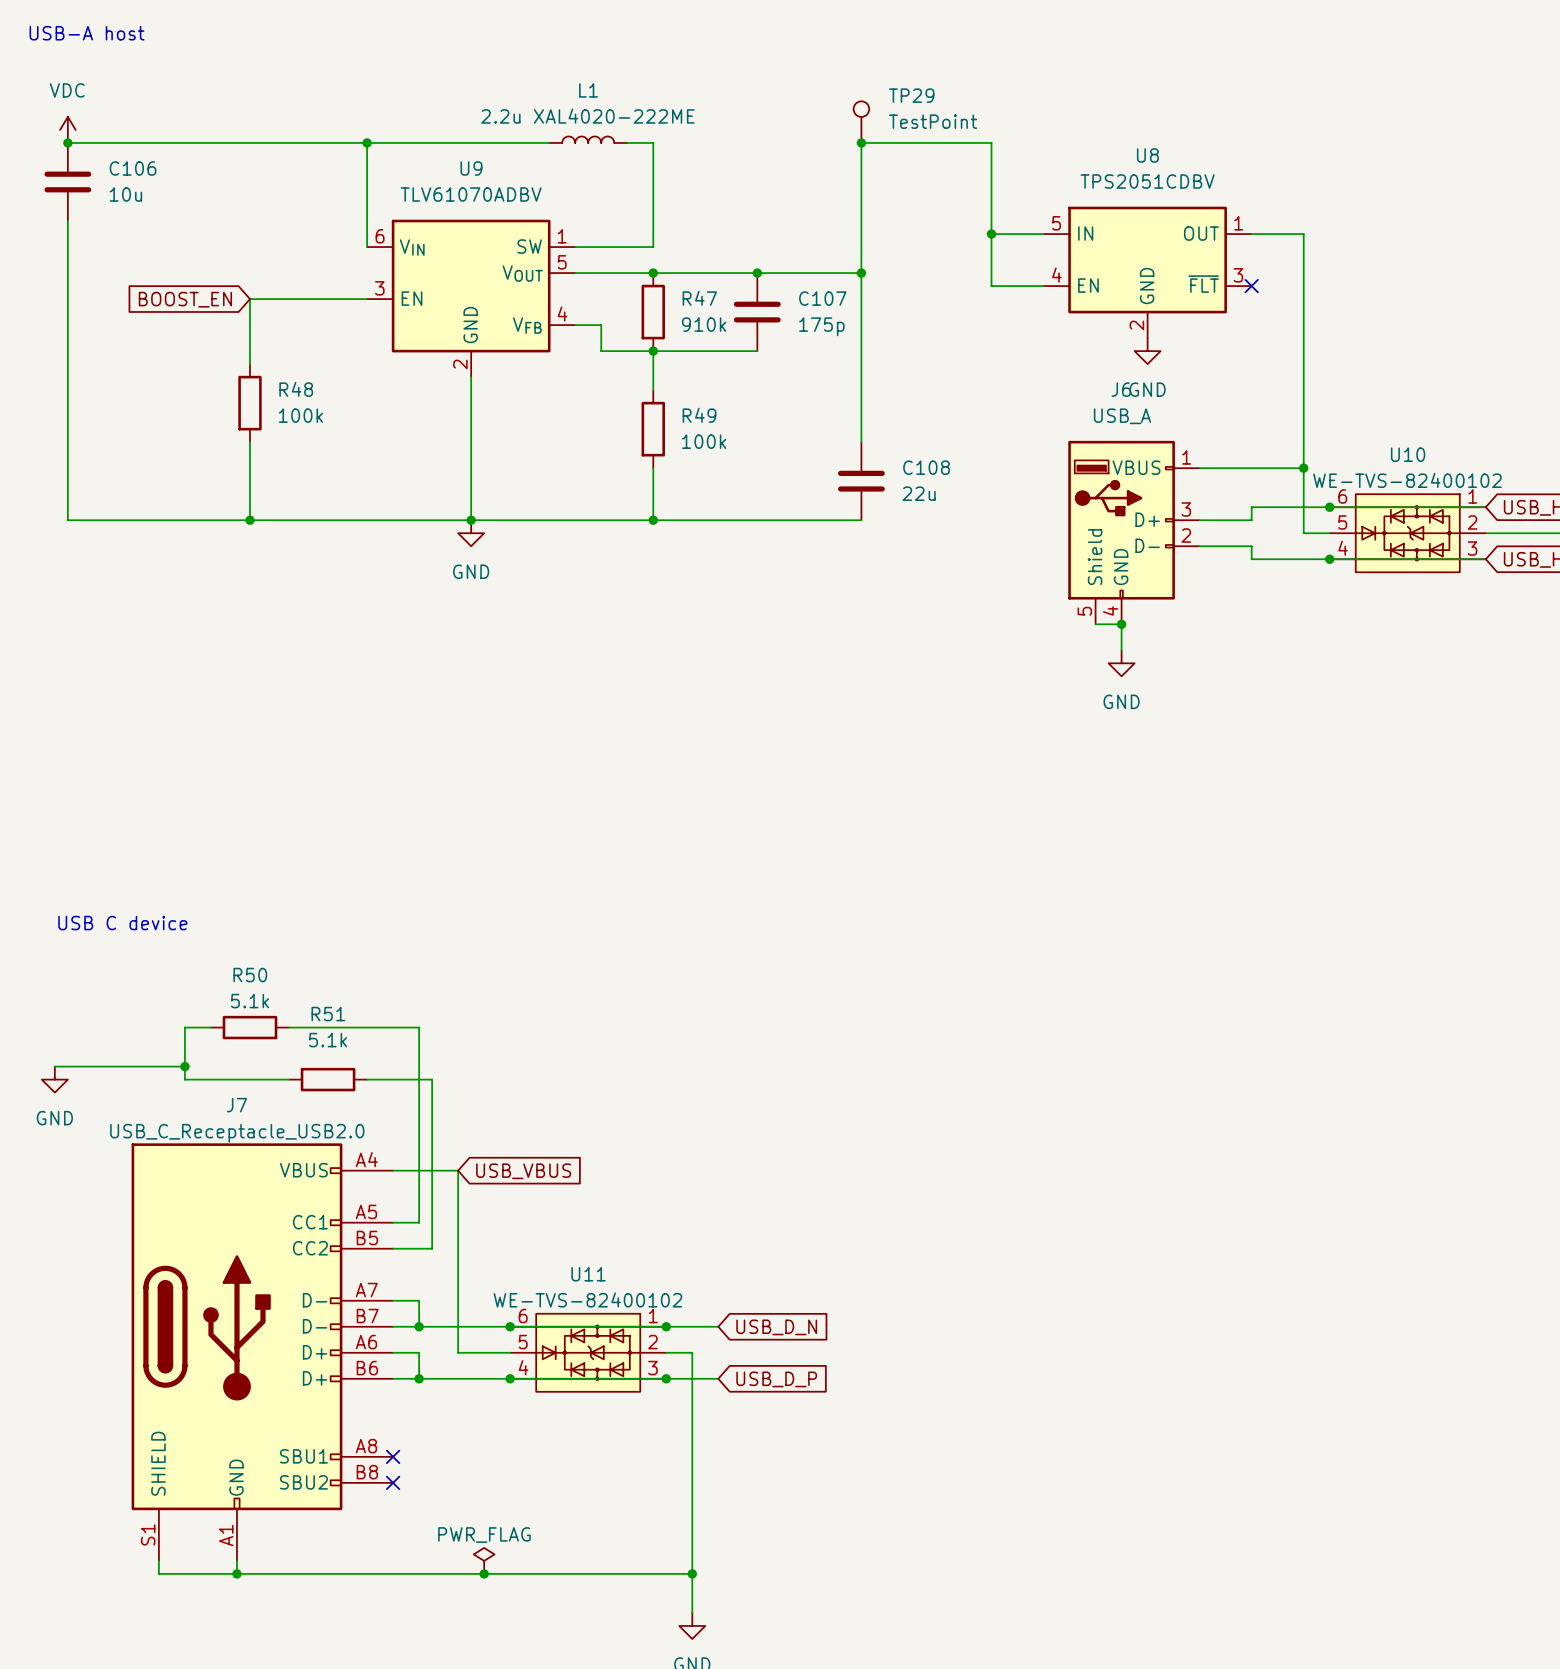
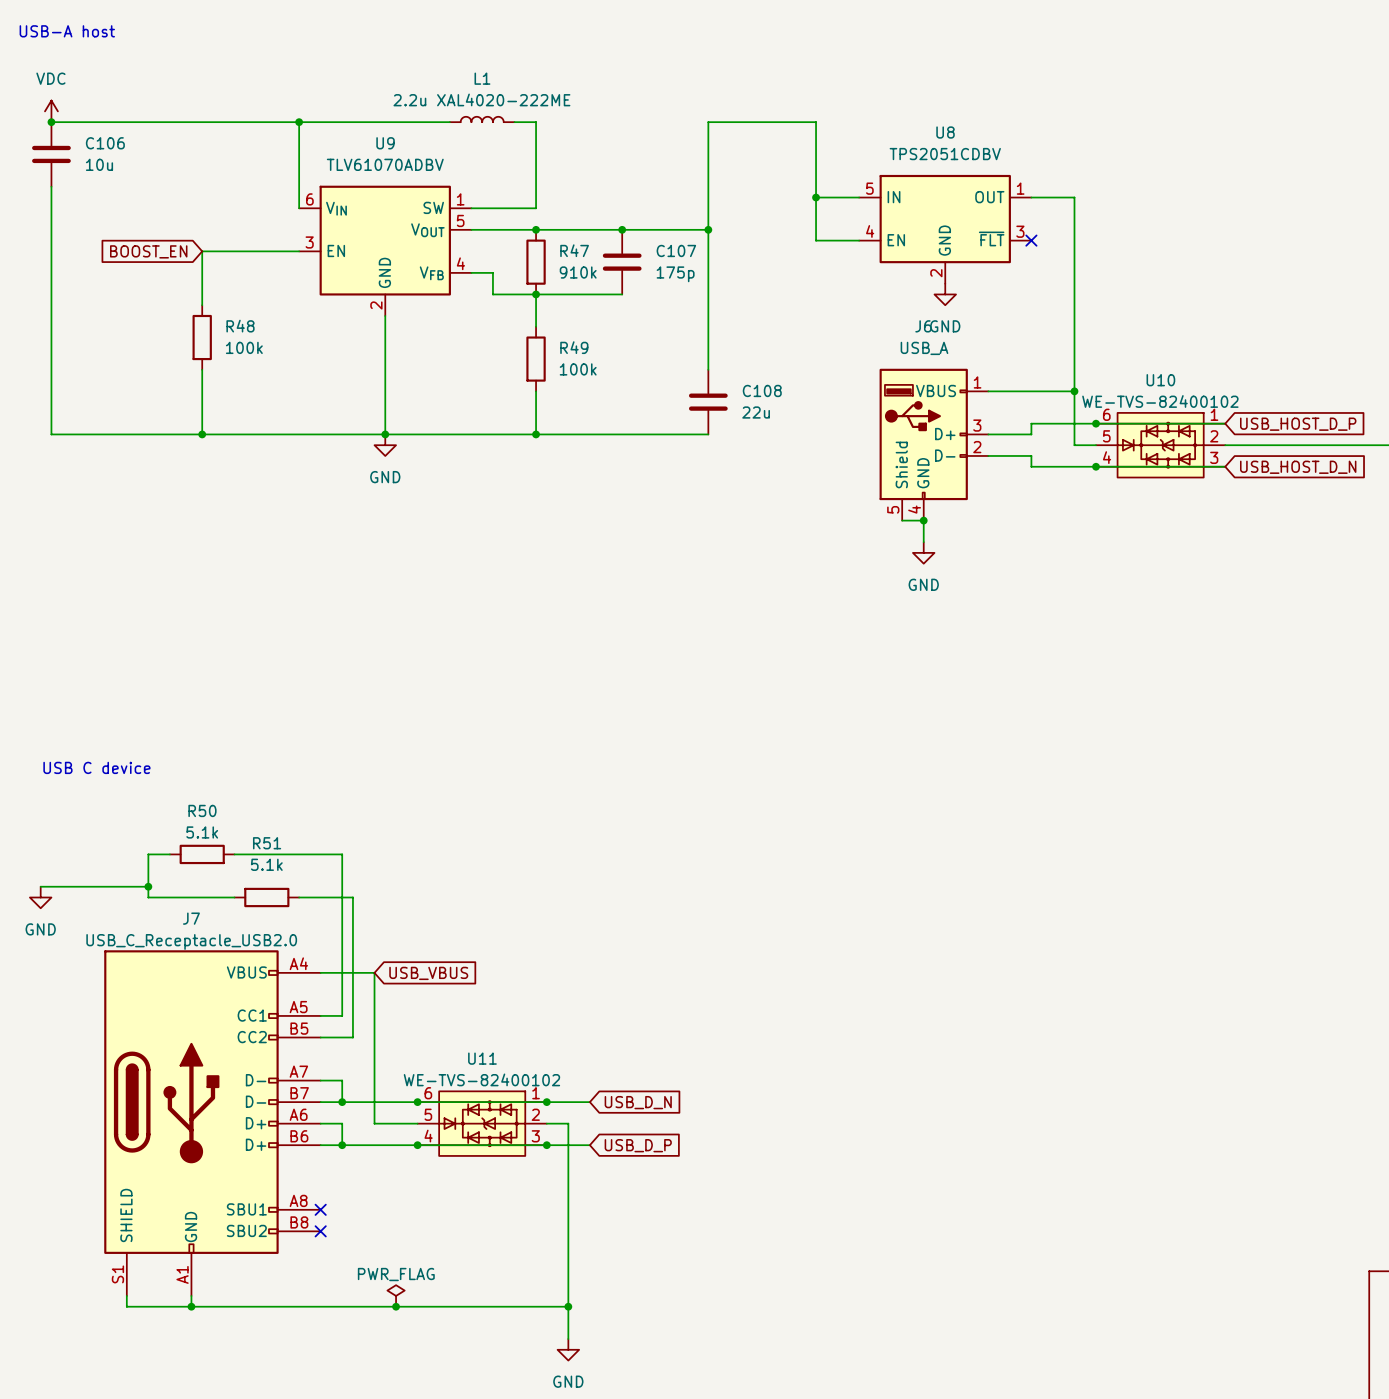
TP29: TestPoint (861, 122) -> none
junction: (861, 142) -> none

